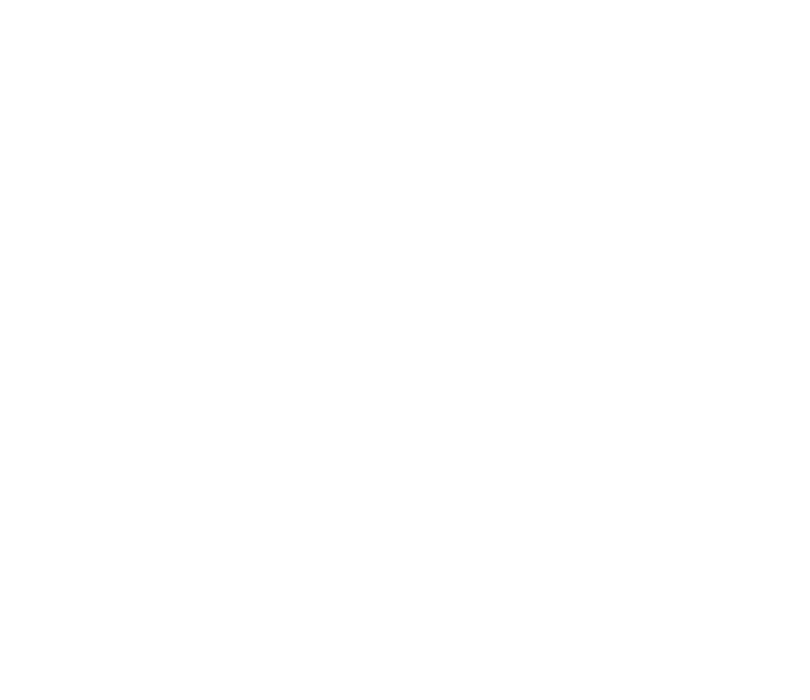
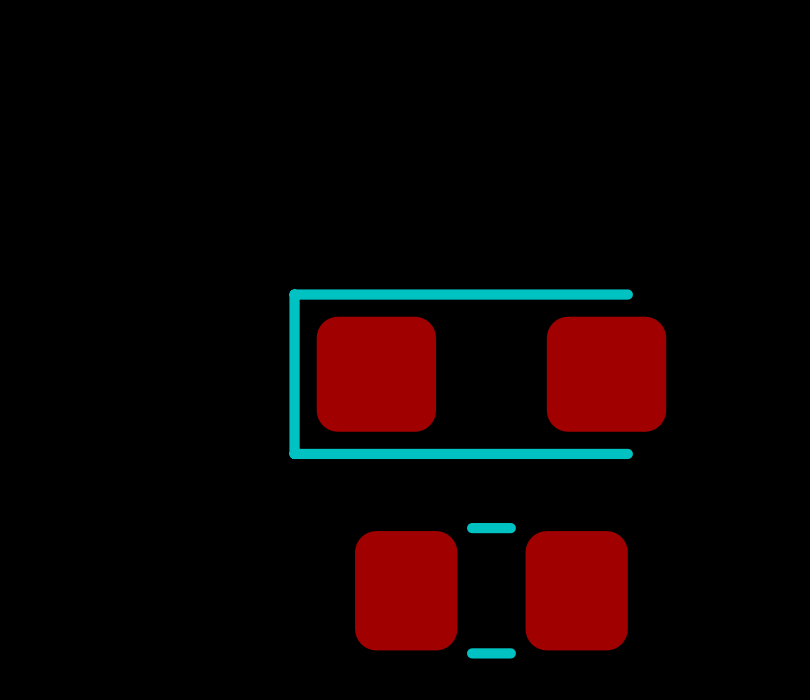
part: none -> (477, 374)
part: none -> (491, 590)

